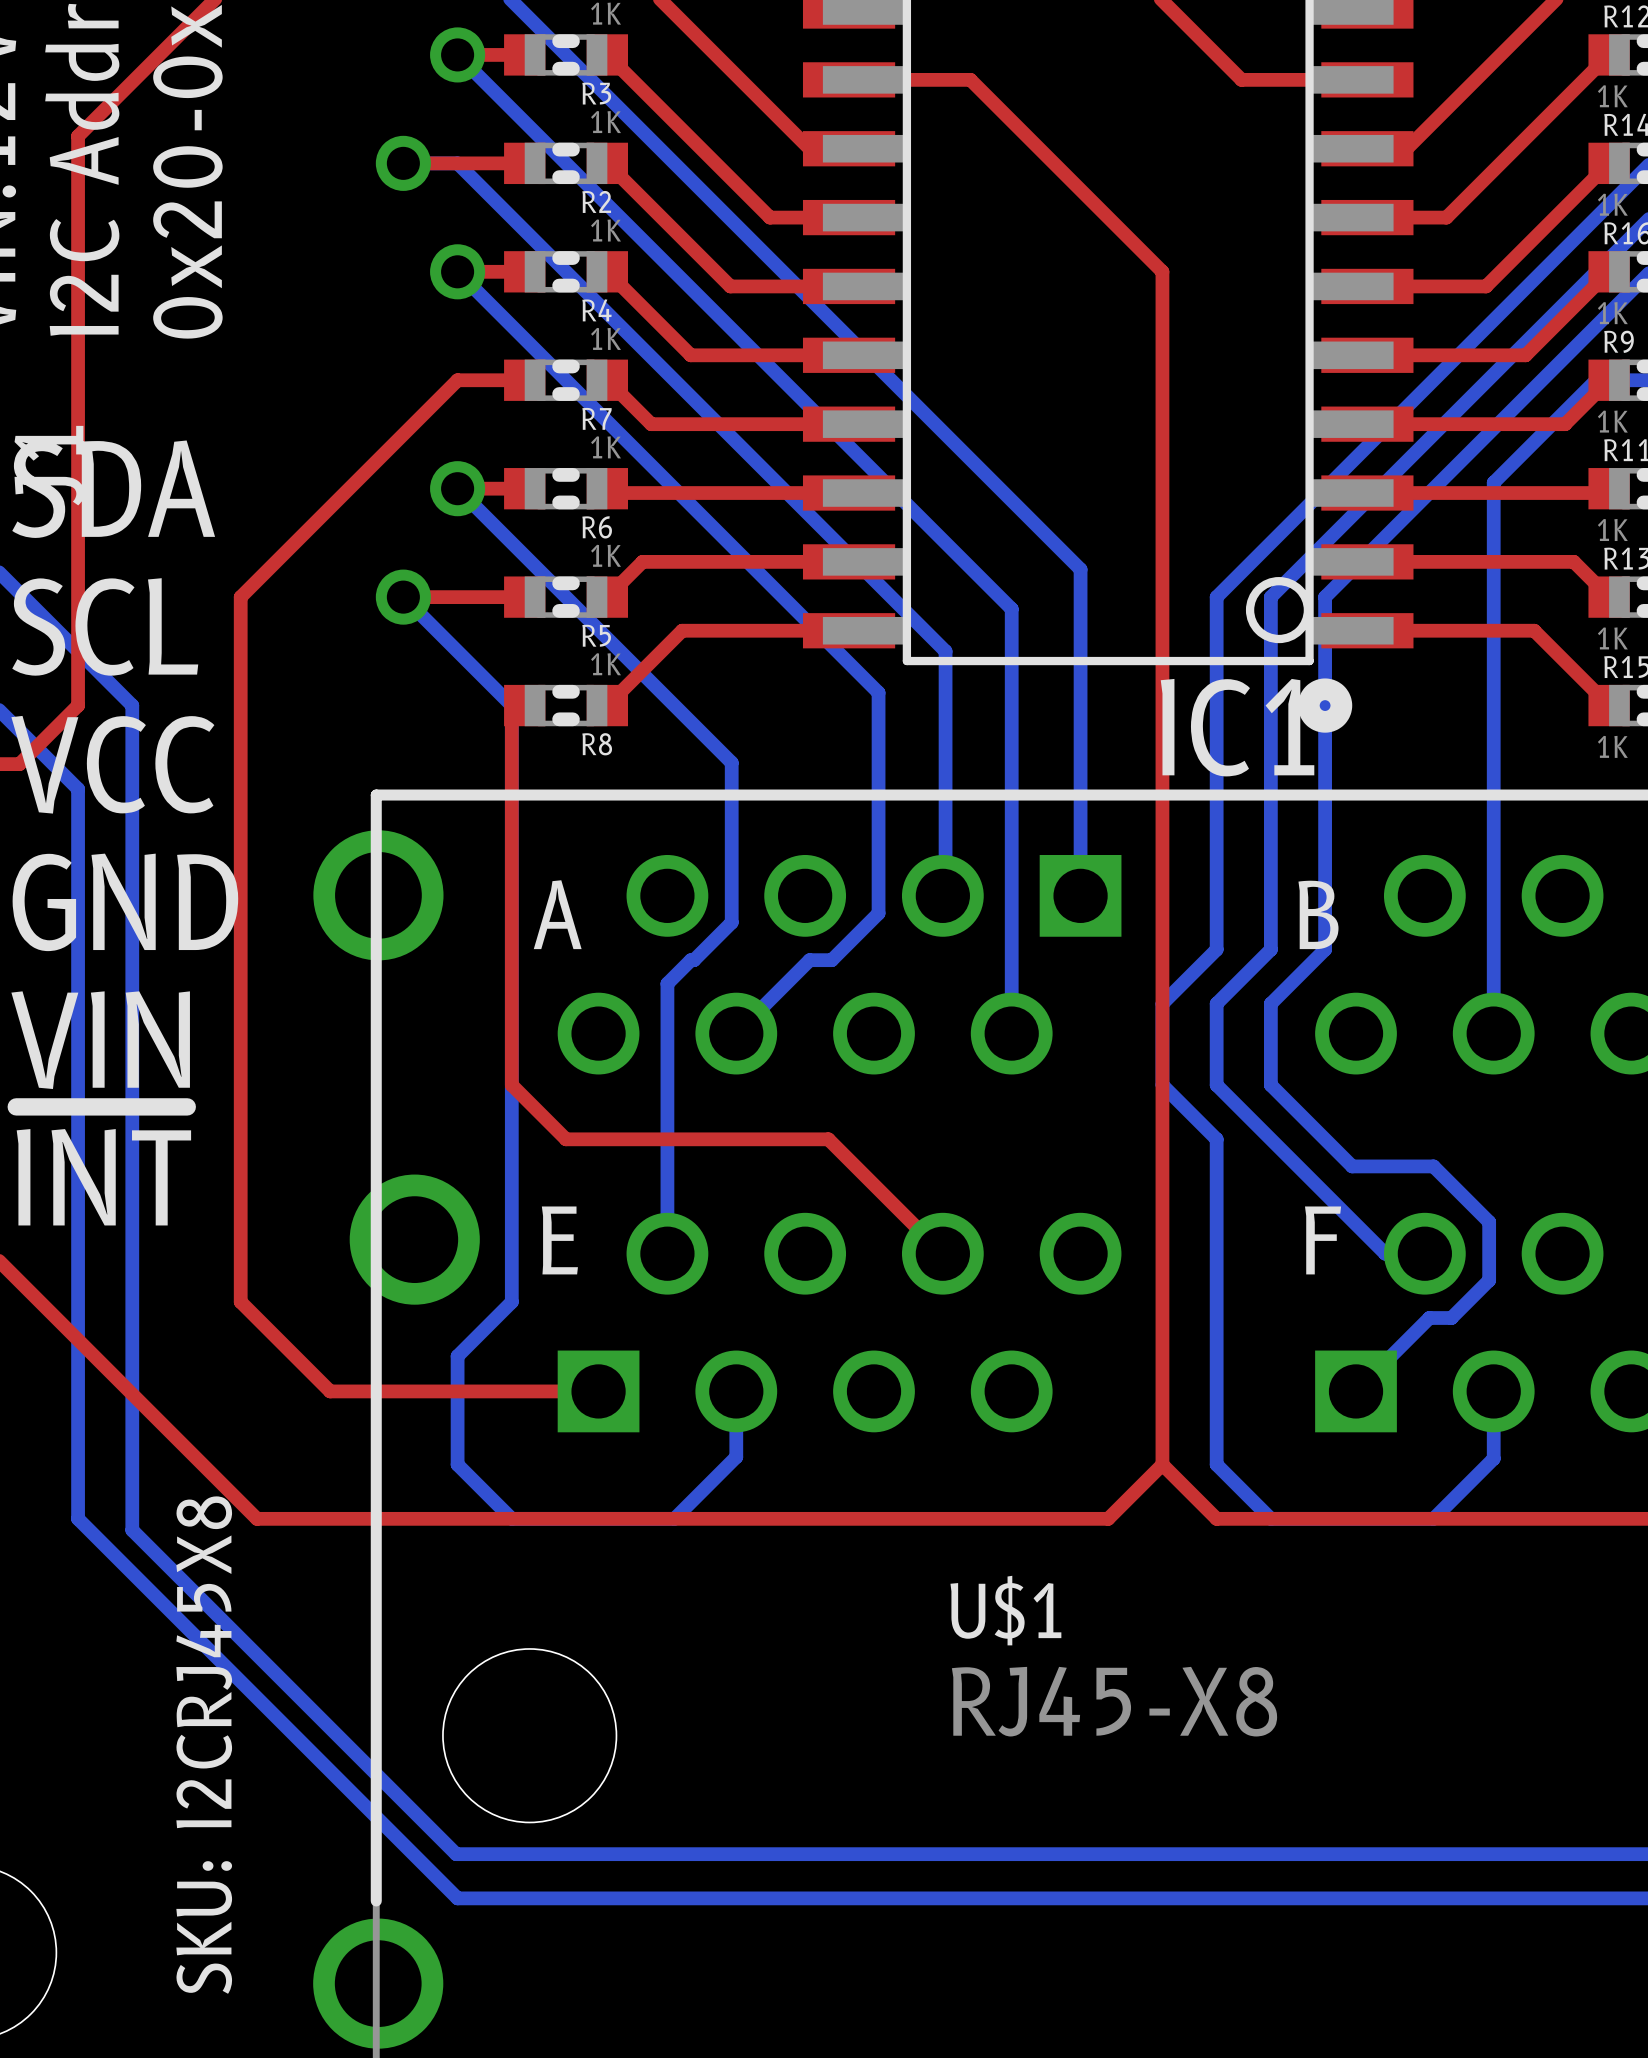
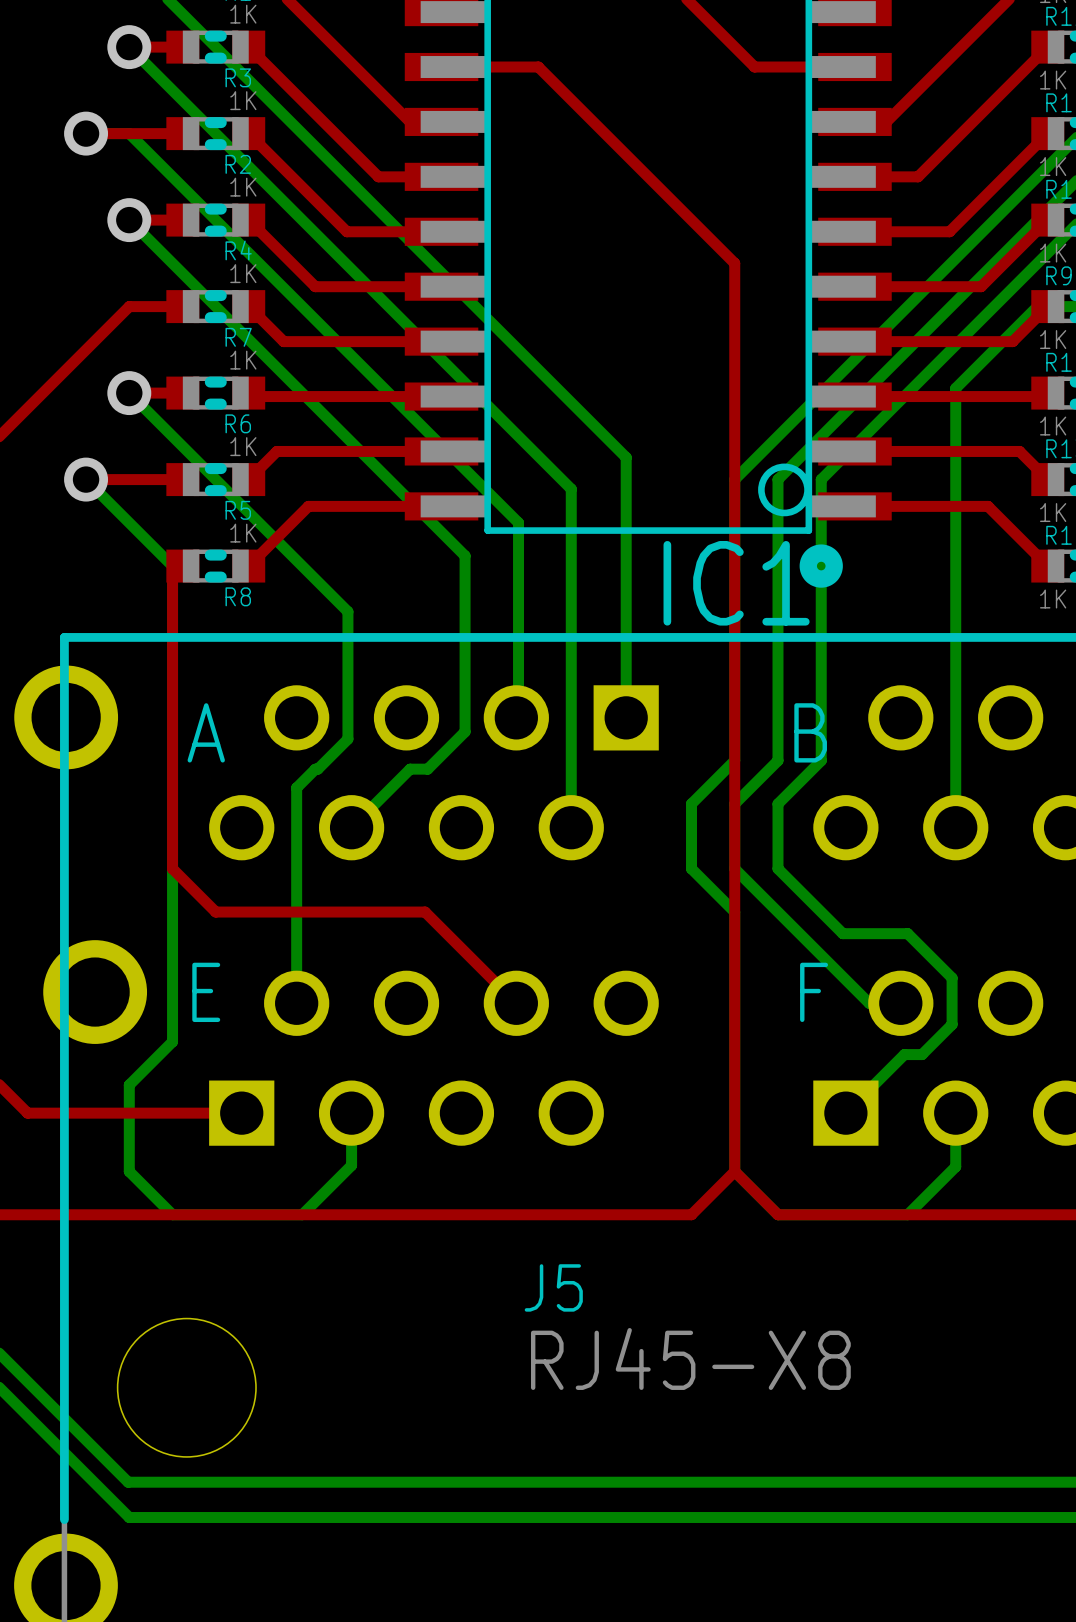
top track: (1162, 271) (1162, 1464) -> (691, 220) (734, 263) (734, 1171)
top track: (1162, 1464) (1108, 1518) -> (734, 1171) (691, 1214) (648, 1214)
top track: (1162, 1464) (1216, 1518) (1270, 1518) -> (734, 1171) (777, 1214)
U$1 name: U$1 (1005, 1610) -> J5 (553, 1287)

